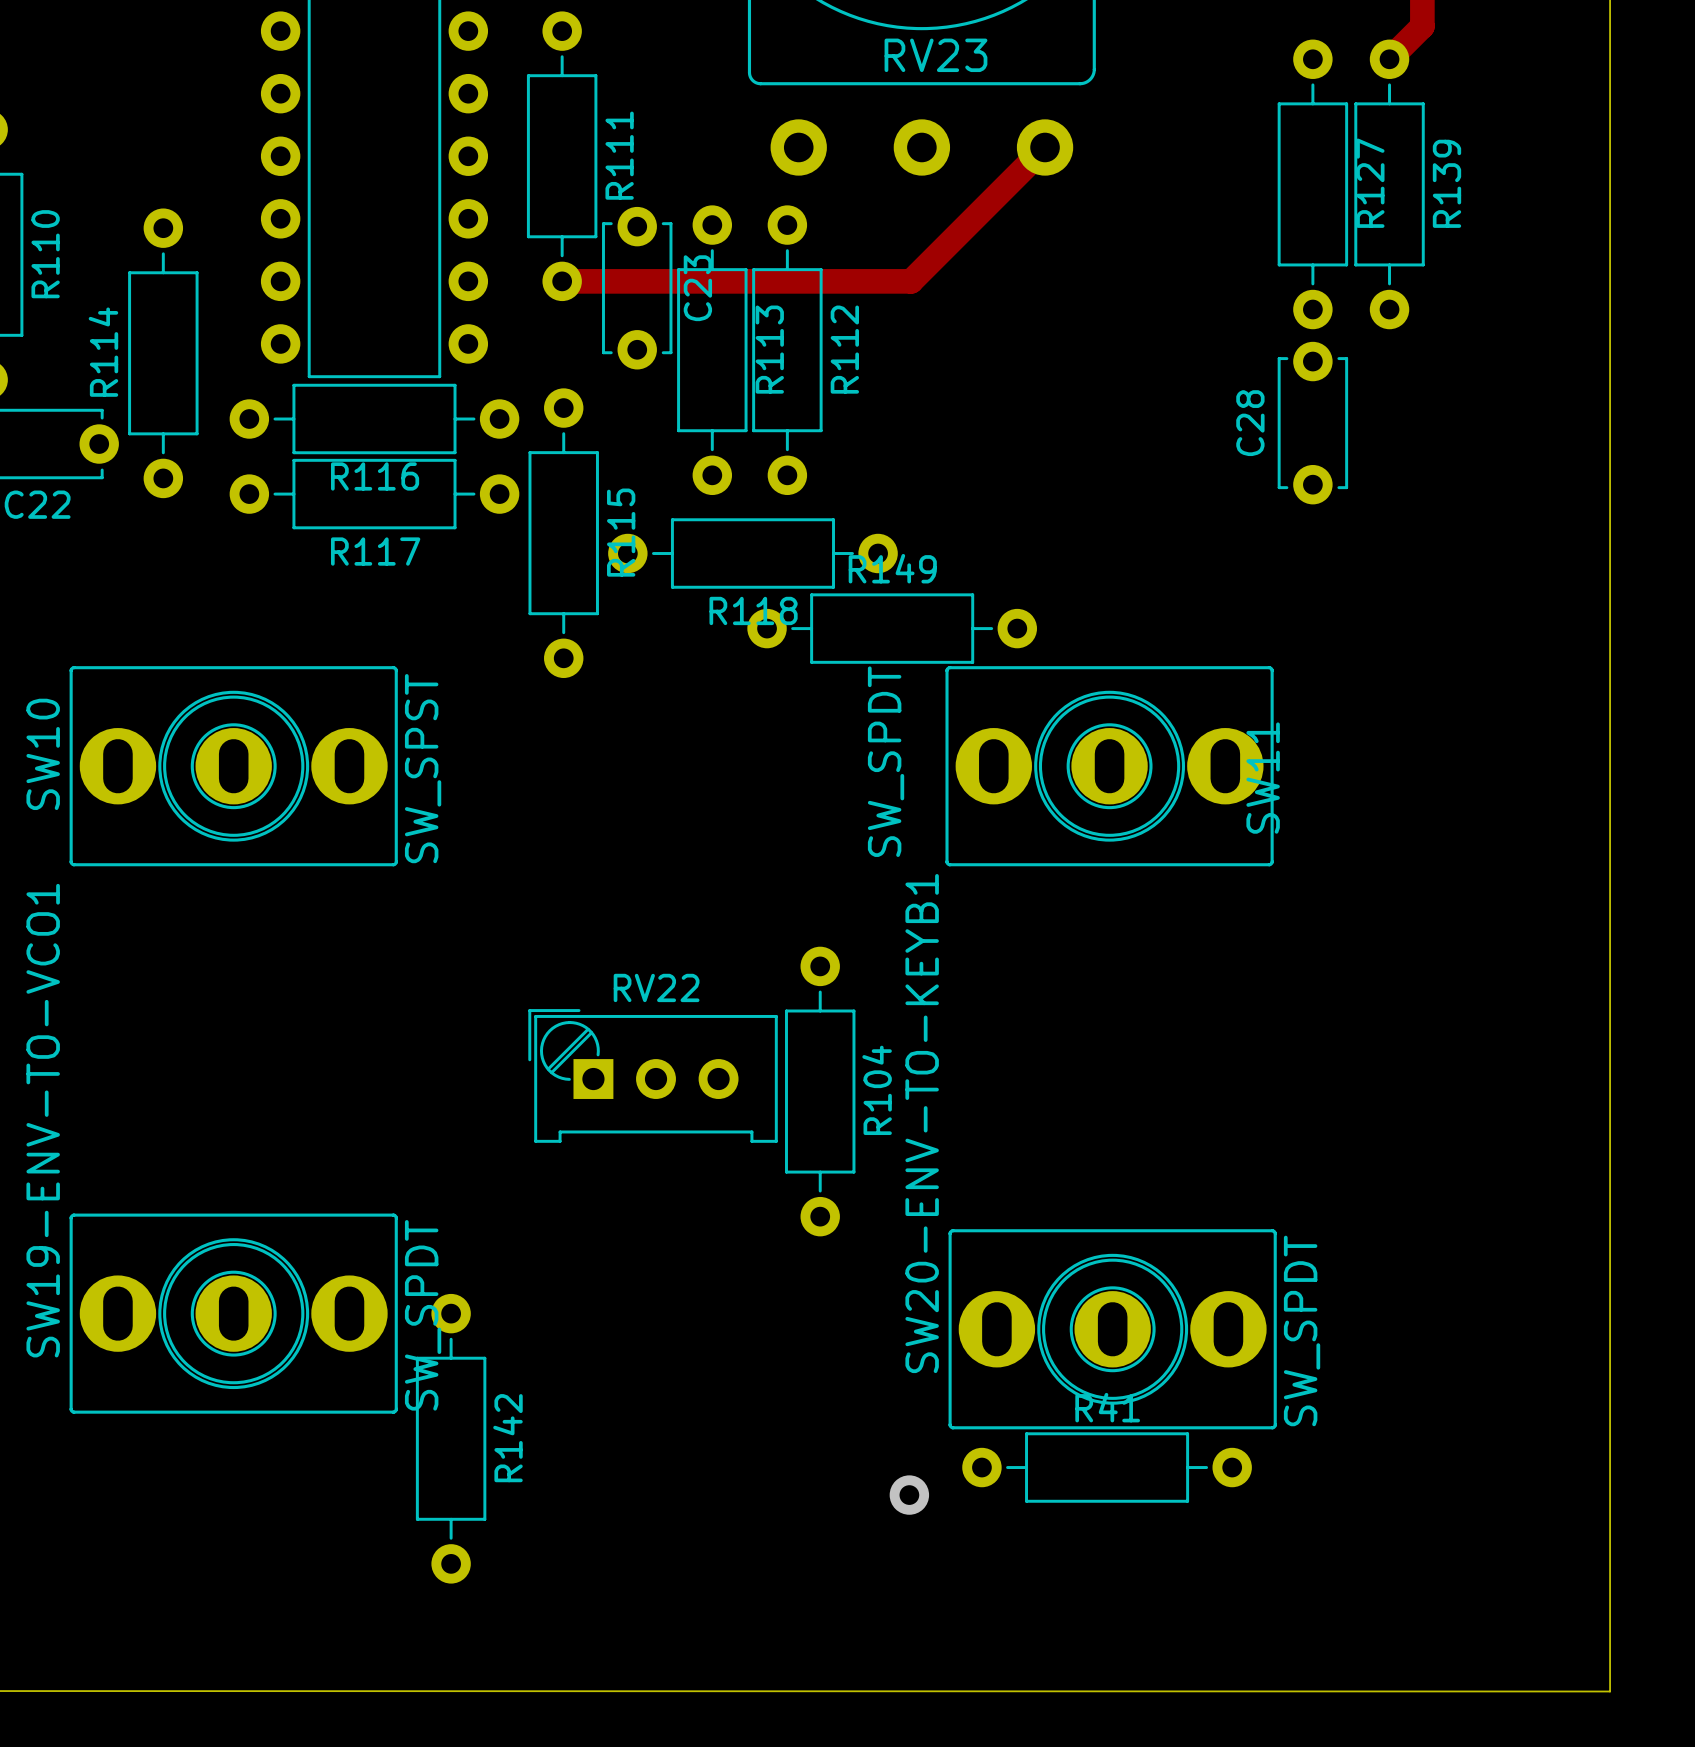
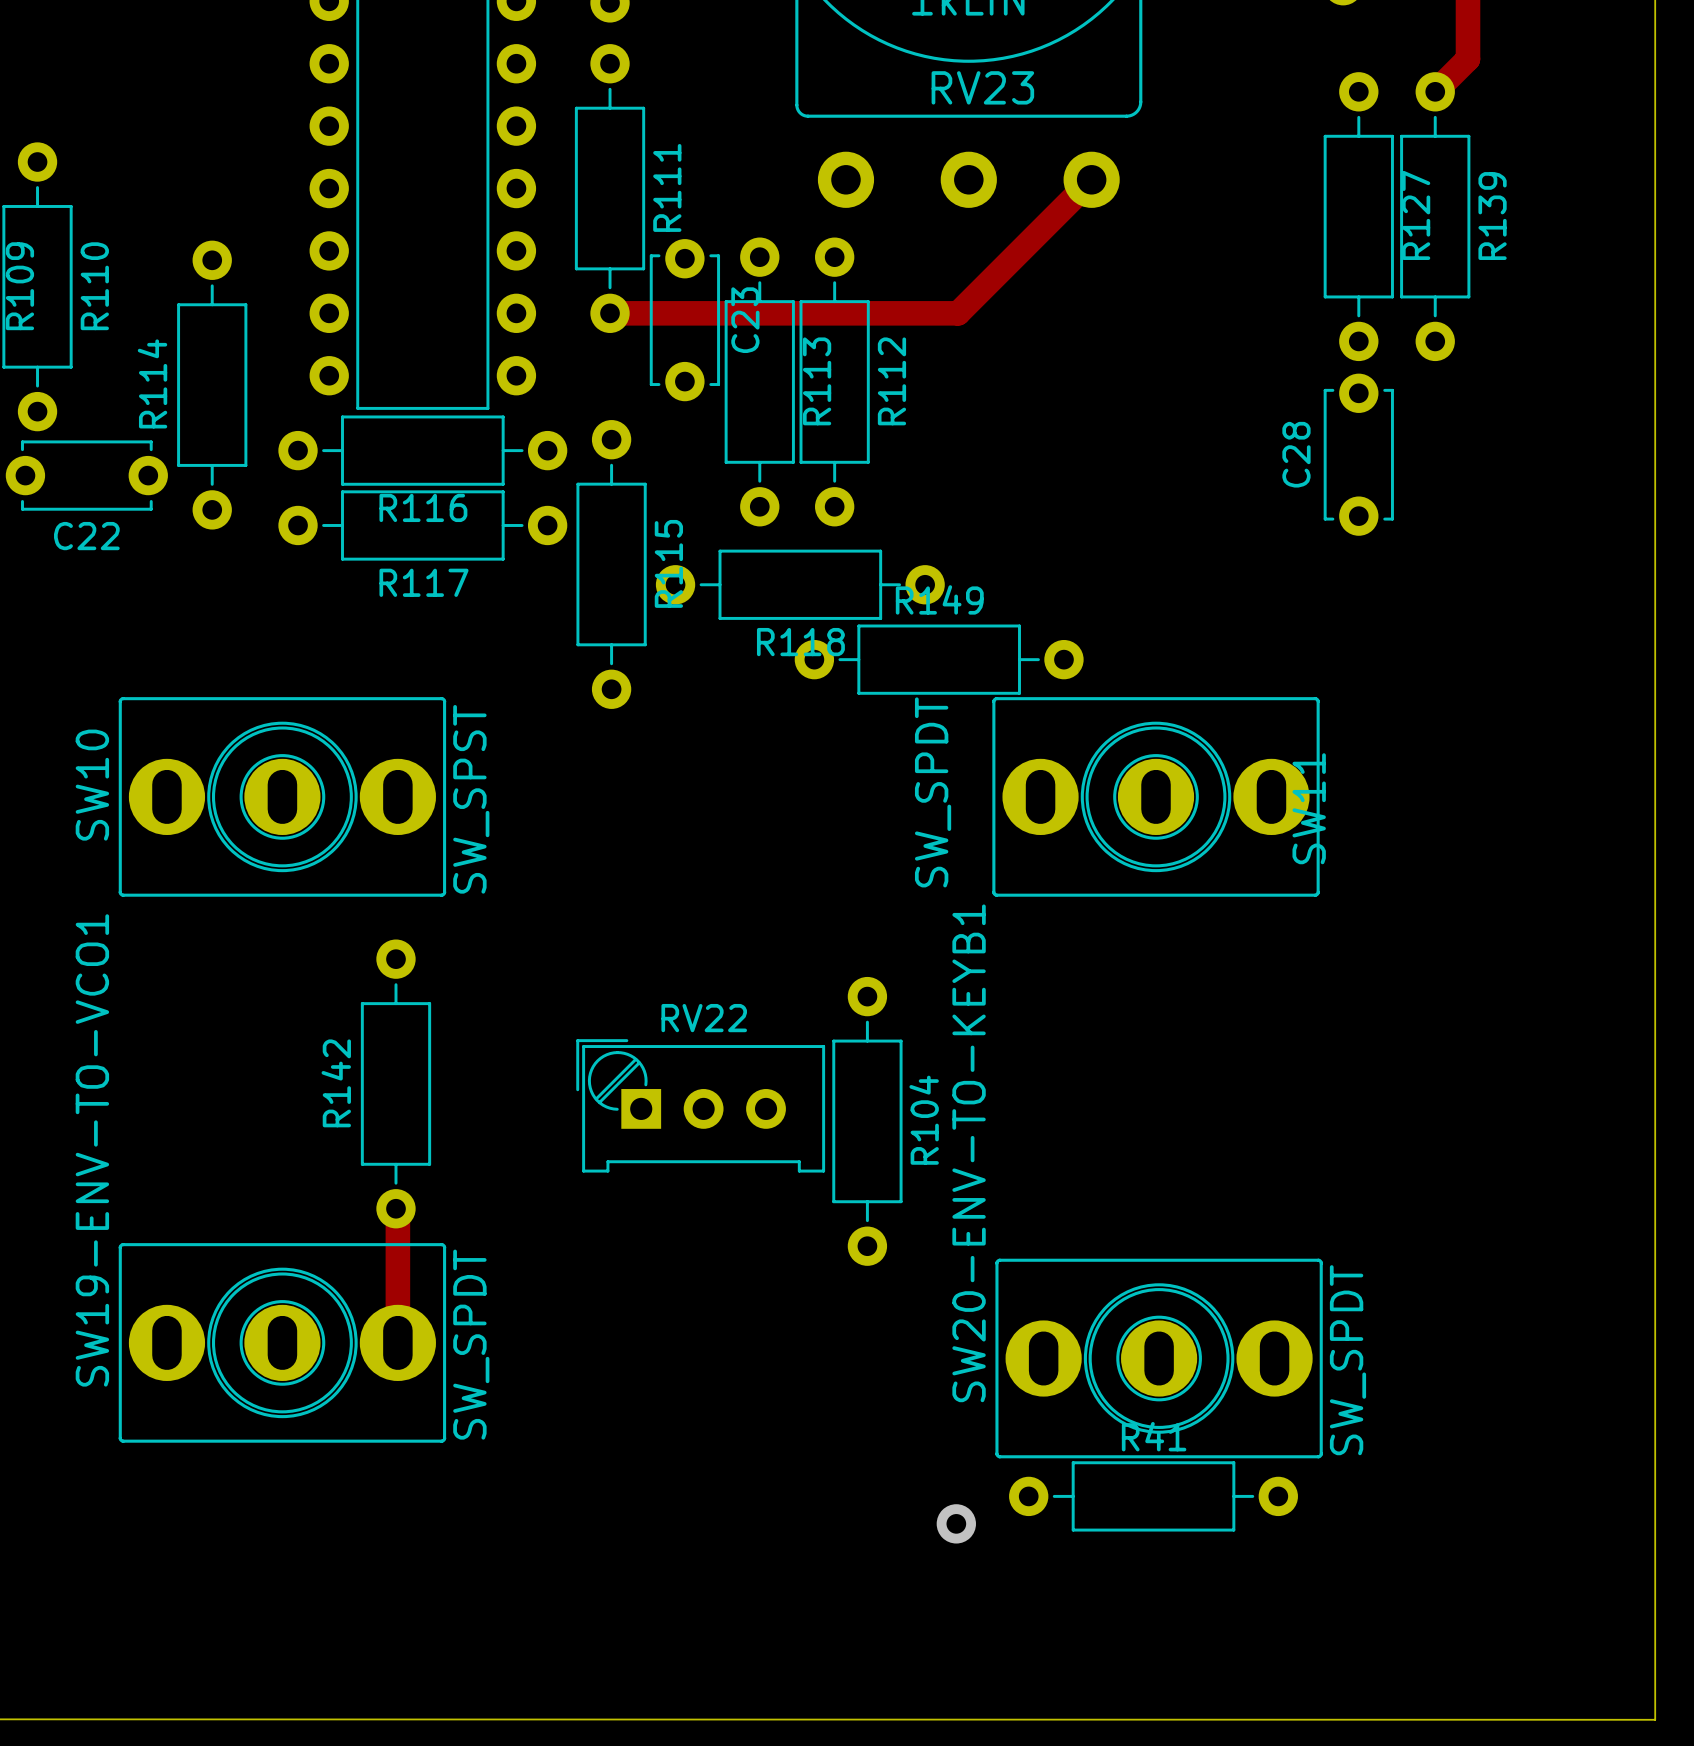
track: none -> (395, 1208) (397, 1210) (397, 1342)
R142 position: (451, 1438) -> (395, 1083)
R142 name position: R142 (507, 1438) -> R142 (336, 1083)

